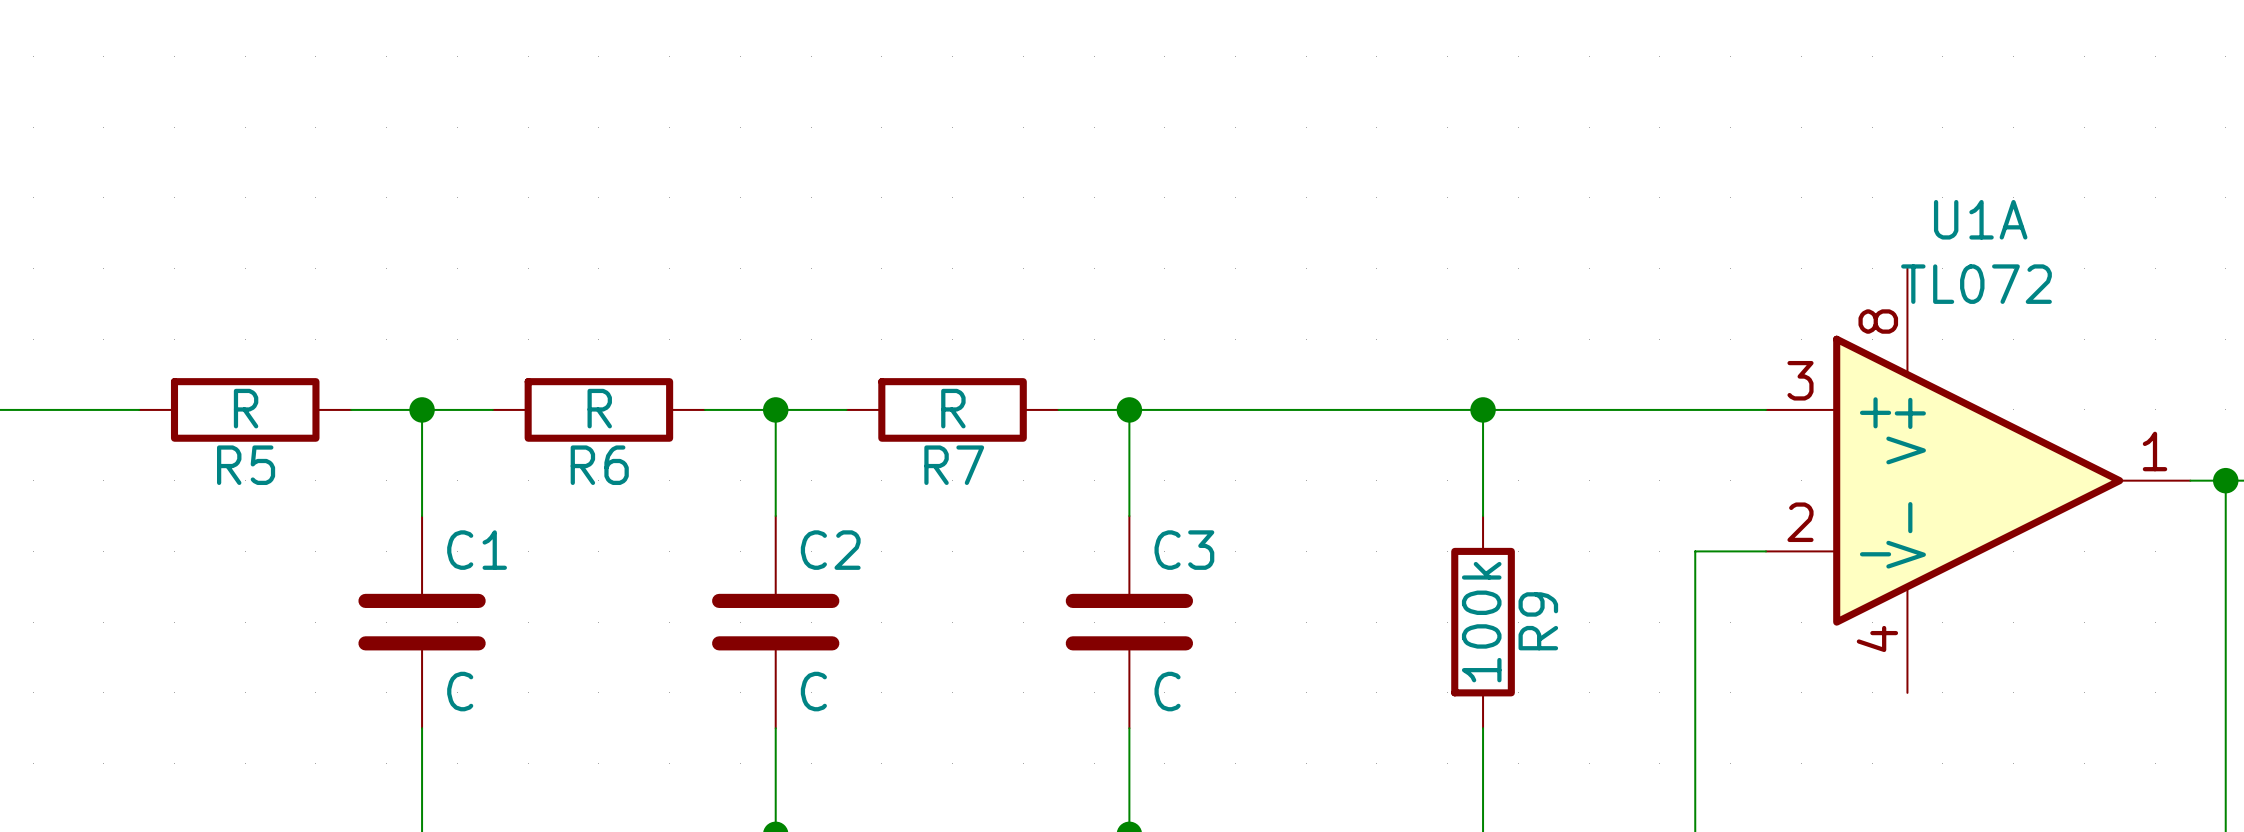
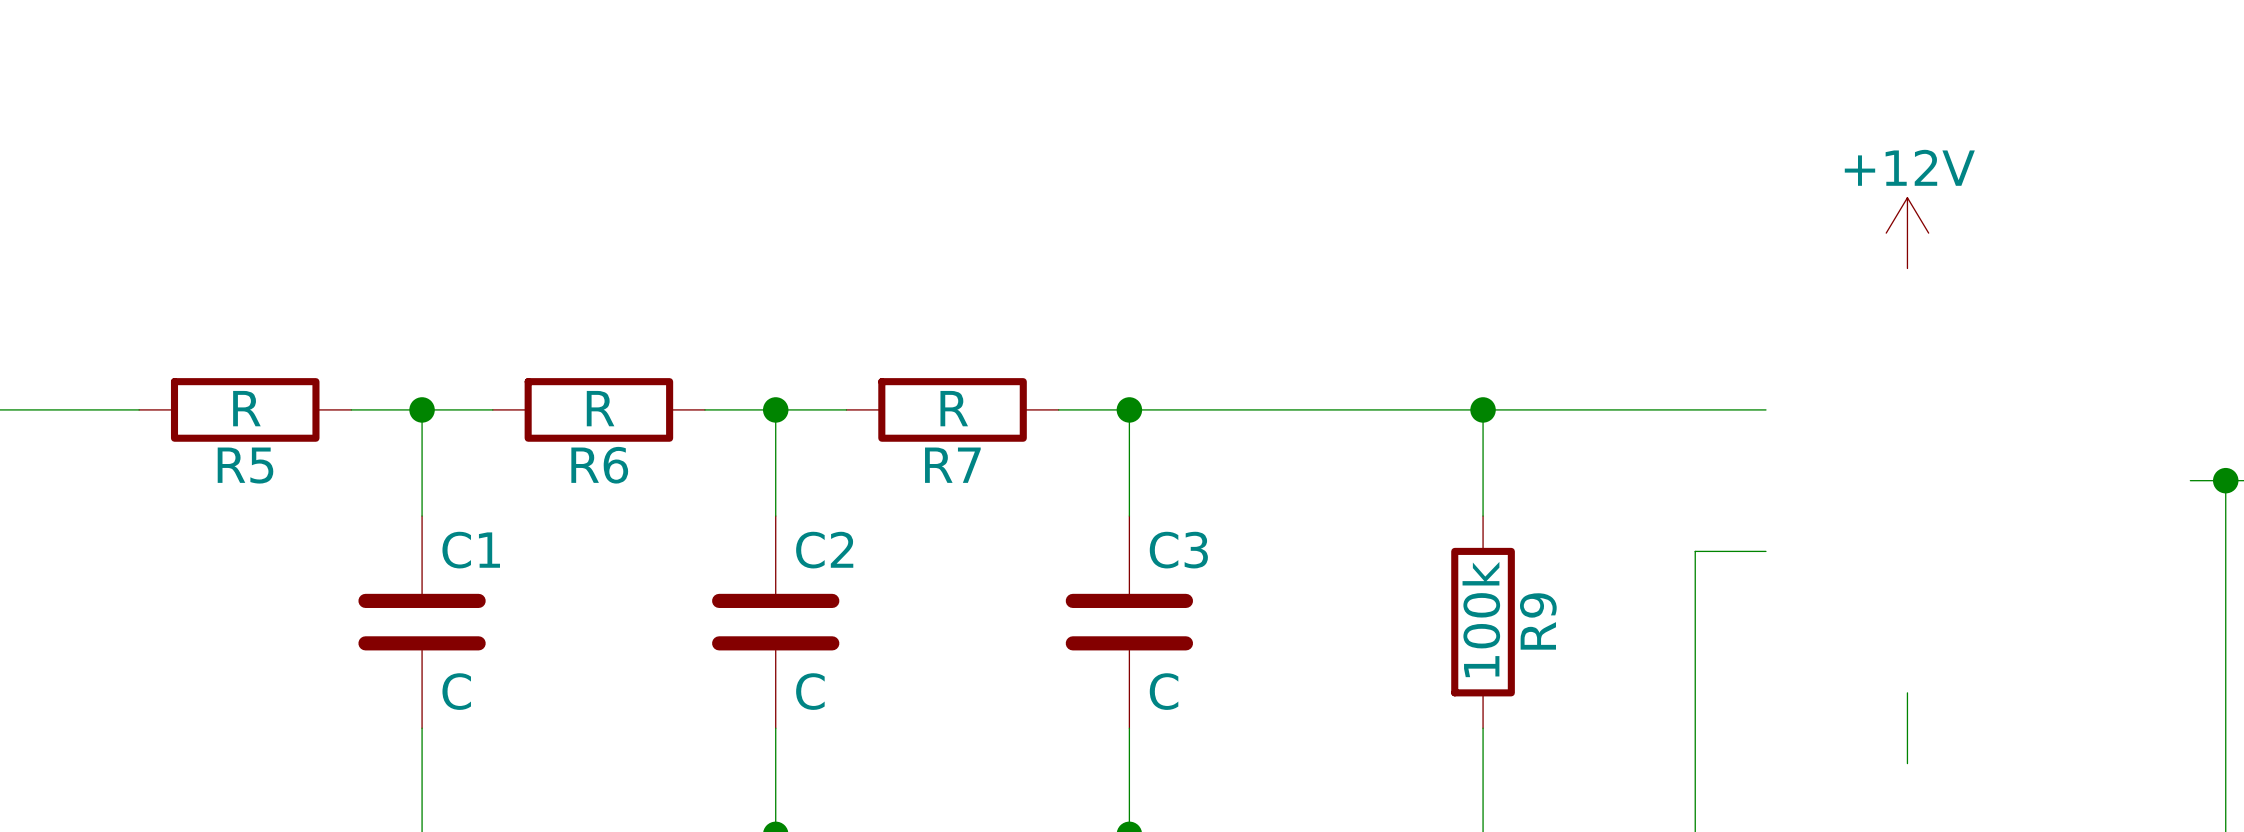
power symbol: none -> +12V (1907, 233)
U1A: TL072 (1978, 480) -> none
wire: none -> (1907, 692) (1907, 763)

